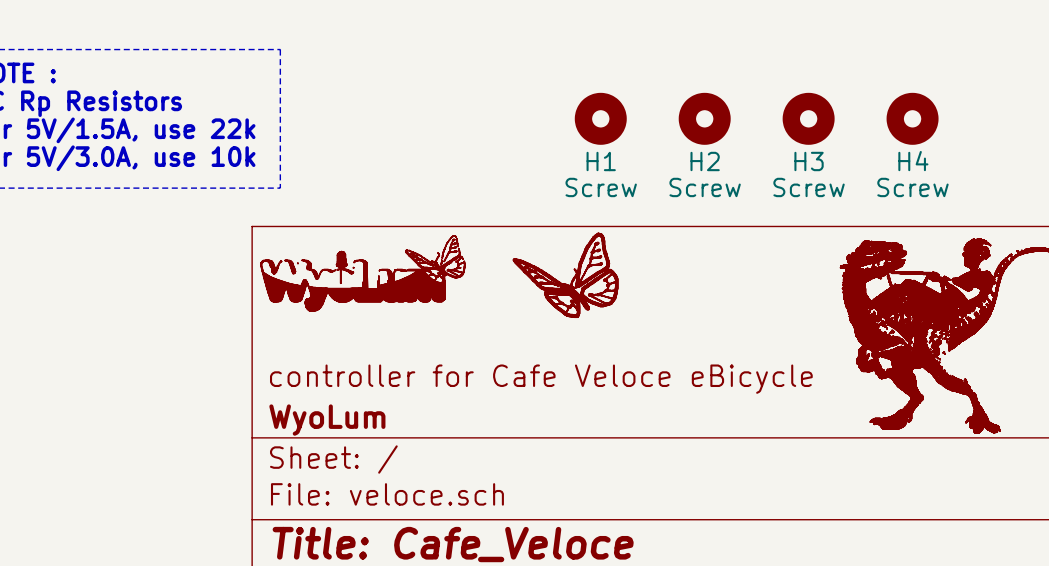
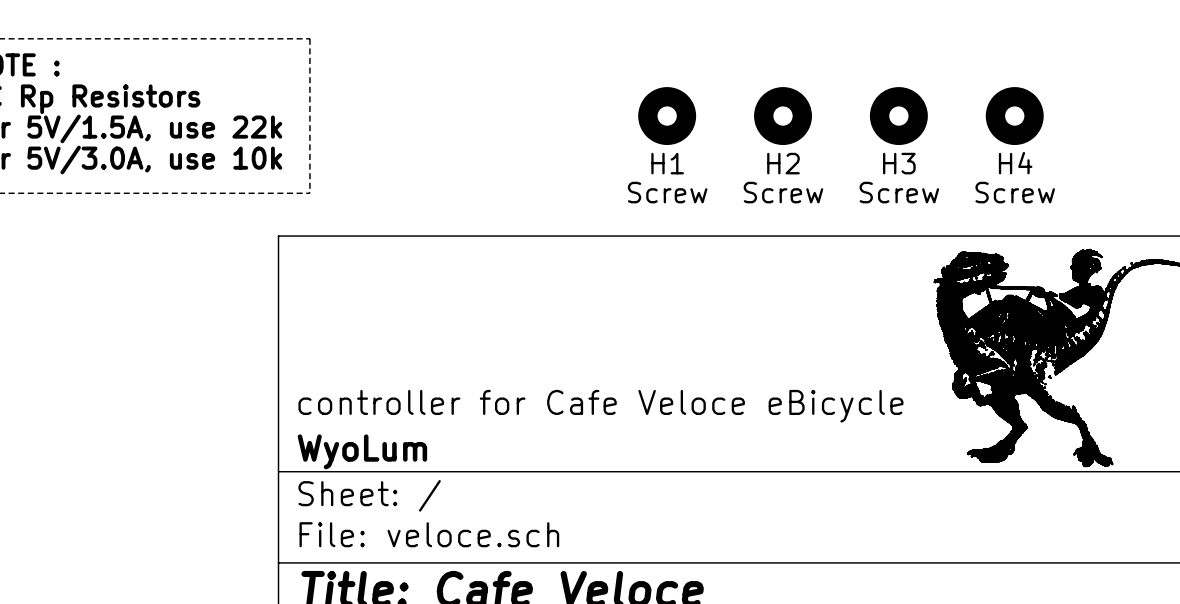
part: (362, 273) -> none
part: (565, 275) -> none

